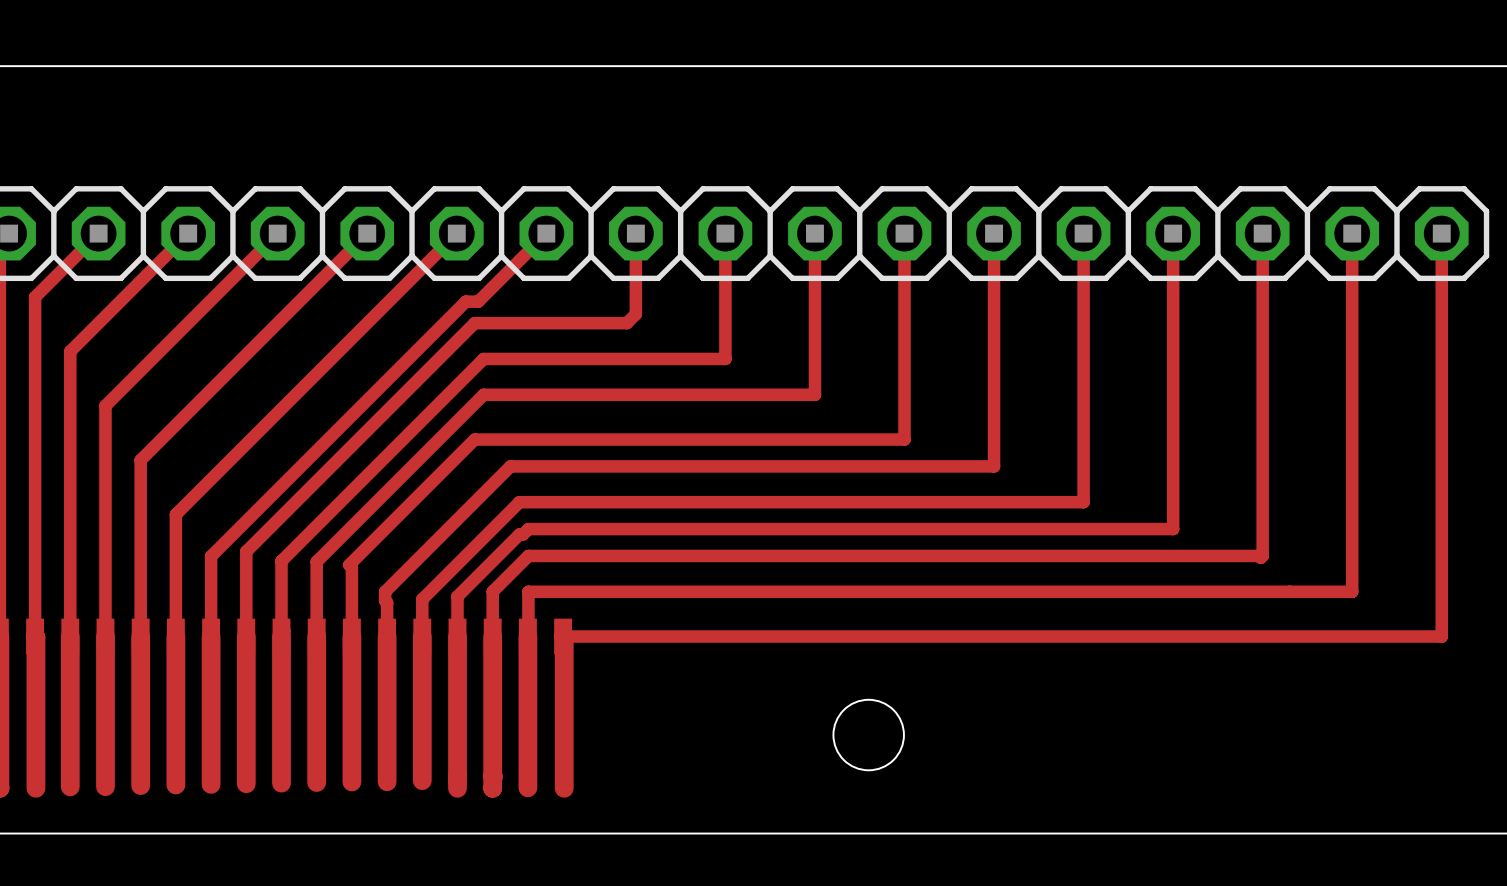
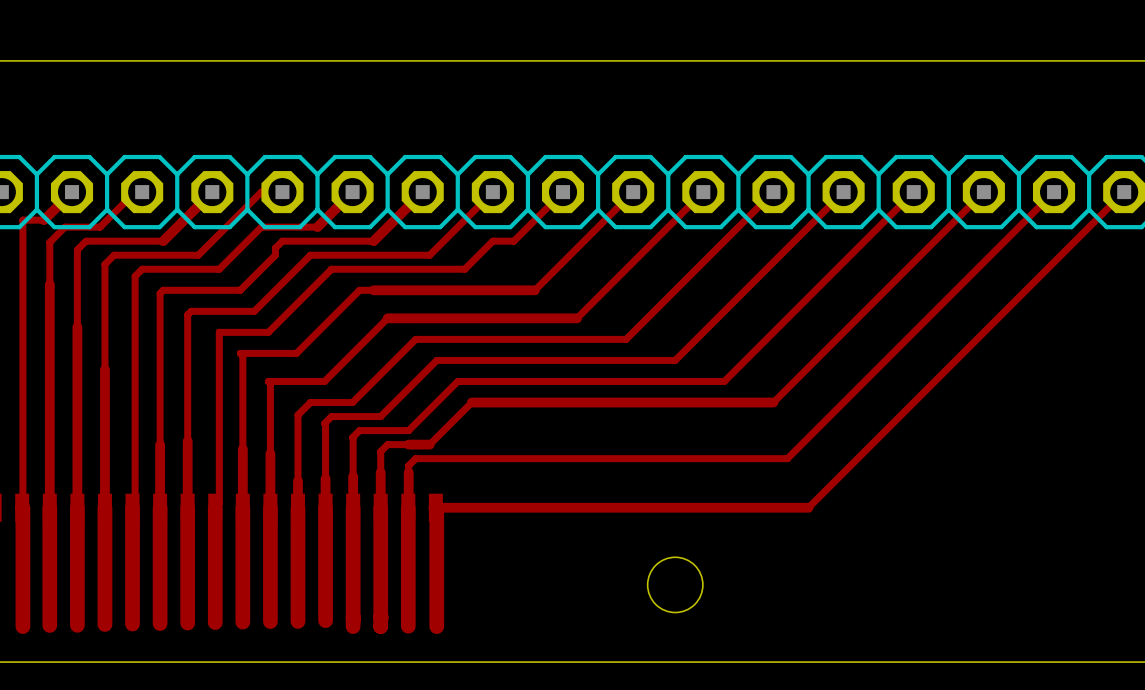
track: (188, 233) (70, 351) -> (142, 192) (135, 192) (100, 227) (64, 227) (49, 242) (49, 284)
track: (367, 233) (140, 460) -> (282, 192) (261, 192) (198, 255) (114, 255) (104, 264) (104, 369)
track: (635, 233) (635, 314) (626, 323) (474, 323) (246, 551) -> (492, 192) (429, 255) (310, 255) (254, 311) (191, 311) (187, 314) (187, 441)
track: (725, 233) (725, 358) (689, 358) -> (563, 192) (513, 241) (492, 241) (464, 269) (331, 269) (268, 332) (219, 332) (219, 503)
track: (814, 233) (814, 394) (743, 394) -> (633, 192) (534, 290)
track: (904, 233) (904, 439) (474, 439) (349, 564) (351, 567) -> (703, 192) (577, 318)
track: (994, 233) (994, 466) (510, 466) (385, 591) (385, 600) (387, 602) -> (773, 192) (626, 339) (415, 339) (352, 402) (310, 402) (297, 415) (297, 481)
track: (1083, 233) (1083, 502) (994, 502) -> (983, 192) (773, 402)
track: none -> (843, 192) (675, 360) (436, 360) (380, 416) (331, 416) (324, 423) (325, 478)
track: (1173, 233) (1173, 529) (528, 529) (523, 534) (519, 534) (457, 596) -> (913, 192) (724, 381) (457, 381) (408, 430) (359, 430) (352, 437) (353, 476)
track: (1262, 233) (1262, 555) (1260, 557) (1259, 555) (555, 555) -> none
track: (1352, 233) (1352, 591) (528, 591) -> (1054, 192) (787, 458) (415, 458) (408, 465) (408, 472)
track: (1441, 233) (1441, 636) (1038, 636) -> (1124, 192) (808, 507)
track: (62, 269) (35, 297) (35, 636) -> (43, 220) (22, 220) (22, 507)
track: (412, 278) (175, 514) (175, 636) -> (317, 227) (261, 227) (219, 269) (142, 269) (135, 276) (135, 505)
track: (215, 296) (105, 405) -> (163, 241) (86, 241) (77, 249) (77, 327)
track: (483, 296) (478, 301) (465, 301) (211, 556) -> (373, 241) (282, 241) (275, 248) (275, 255) (240, 290) (163, 290) (160, 293) (160, 444)
track: (483, 358) (281, 561) (281, 636) -> (373, 290) (359, 290) (296, 353) (240, 353) (242, 355) (242, 449)
track: (501, 394) (483, 394) (316, 561) -> (387, 318) (324, 381) (268, 381) (270, 383) (270, 453)
track: (609, 502) (519, 502) (422, 599) -> (471, 402) (429, 444)
track: (528, 555) (492, 591) -> (408, 444) (387, 444) (380, 451) (380, 472)

